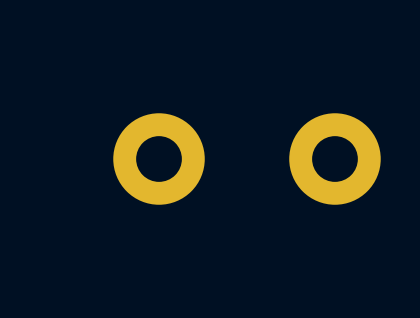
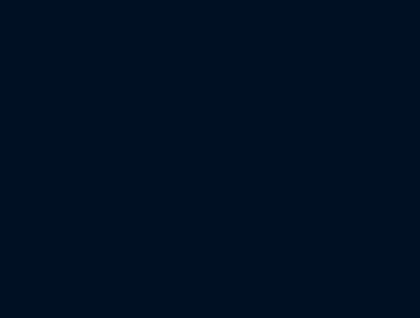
part: (246, 159) -> none

